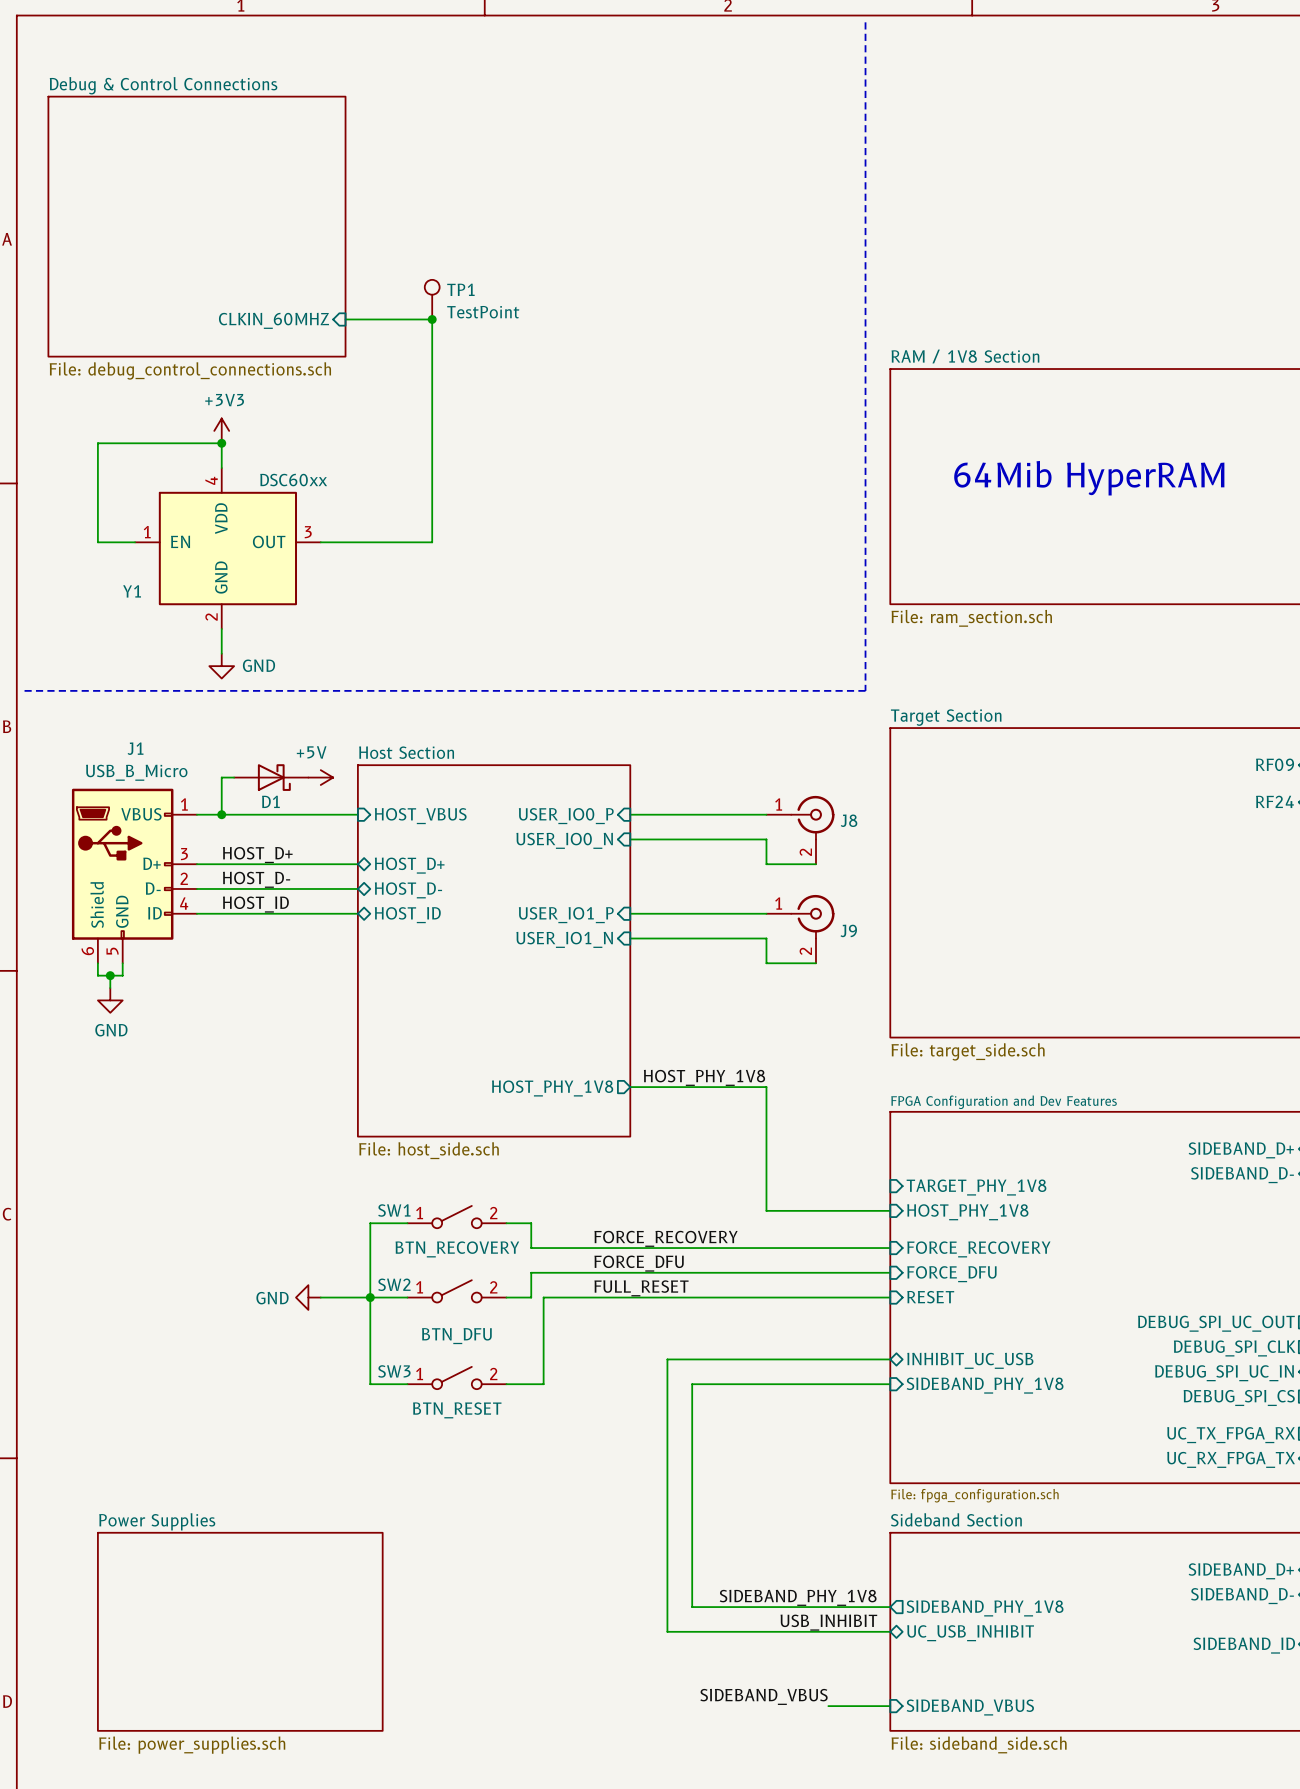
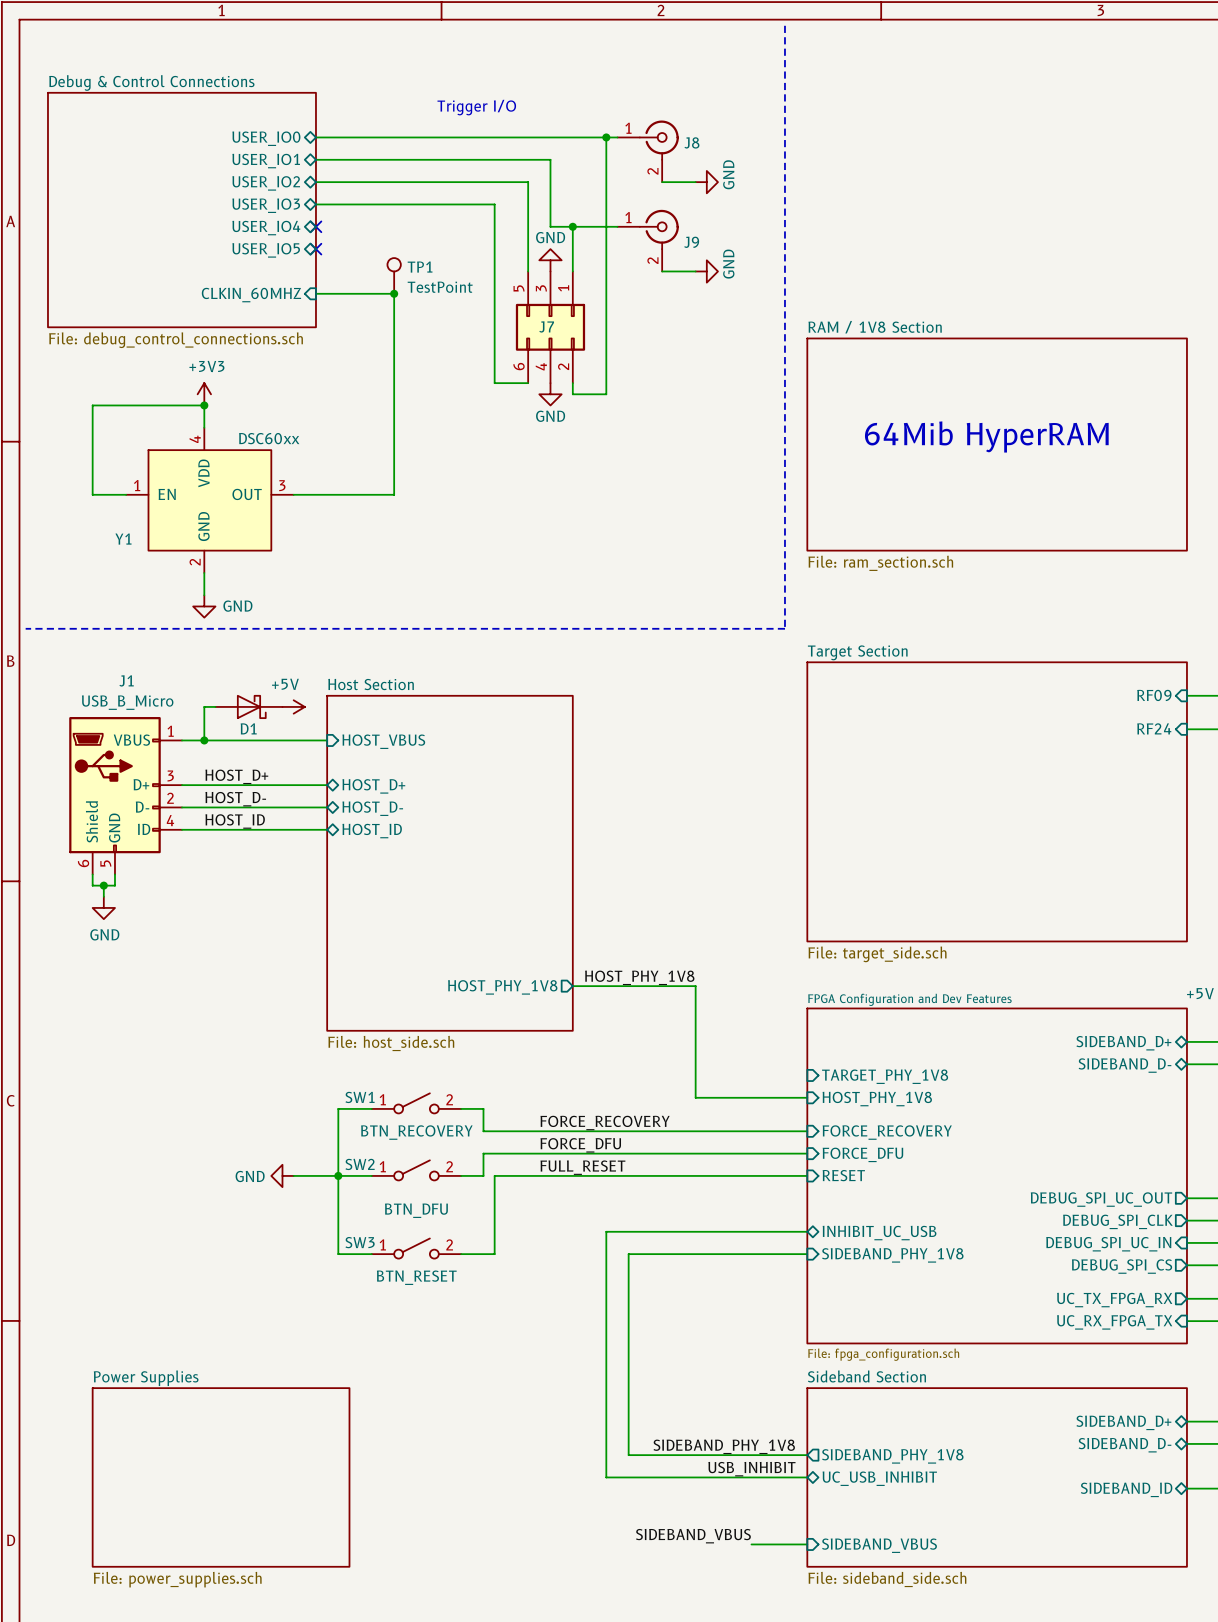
text: none -> Trigger I/O (476, 107)
wire: none -> (315, 137) (617, 137)
wire: none -> (606, 137) (606, 394) (572, 394) (572, 383)
junction: none -> (606, 137)
sheet pin: none -> USER_IO0 (266, 138)
wire: none -> (315, 159) (550, 159) (550, 226) (617, 226)
sheet pin: none -> USER_IO1 (266, 161)
wire: none -> (315, 182) (528, 182) (528, 271)
wire: none -> (662, 182) (695, 182)
power symbol: none -> GND (706, 182)
sheet pin: none -> USER_IO2 (266, 183)
wire: none -> (315, 204) (494, 204) (494, 383) (528, 383)
sheet pin: none -> USER_IO3 (266, 205)
no-connect mark: none -> (315, 226)
wire: none -> (572, 226) (572, 271)
junction: none -> (572, 226)
sheet pin: none -> USER_IO4 (266, 228)
no-connect mark: none -> (315, 249)
sheet pin: none -> USER_IO5 (266, 250)
power symbol: none -> GND (550, 260)
wire: none -> (662, 271) (695, 271)
power symbol: none -> GND (706, 271)
J7: none -> (550, 327)
power symbol: none -> GND (550, 394)
wire: (630, 814) (766, 814) -> none
sheet pin: USER_IO0_P (566, 816) -> none
J8 position: (800, 830) -> (648, 151)
wire: (630, 839) (766, 839) (766, 864) (815, 864) -> none
sheet pin: USER_IO0_N (564, 840) -> none
wire: (630, 913) (766, 913) -> none
sheet pin: USER_IO1_P (566, 915) -> none
J9 position: (800, 929) -> (648, 240)
wire: (630, 938) (766, 938) (766, 963) (815, 963) -> none
sheet pin: USER_IO1_N (564, 939) -> none

